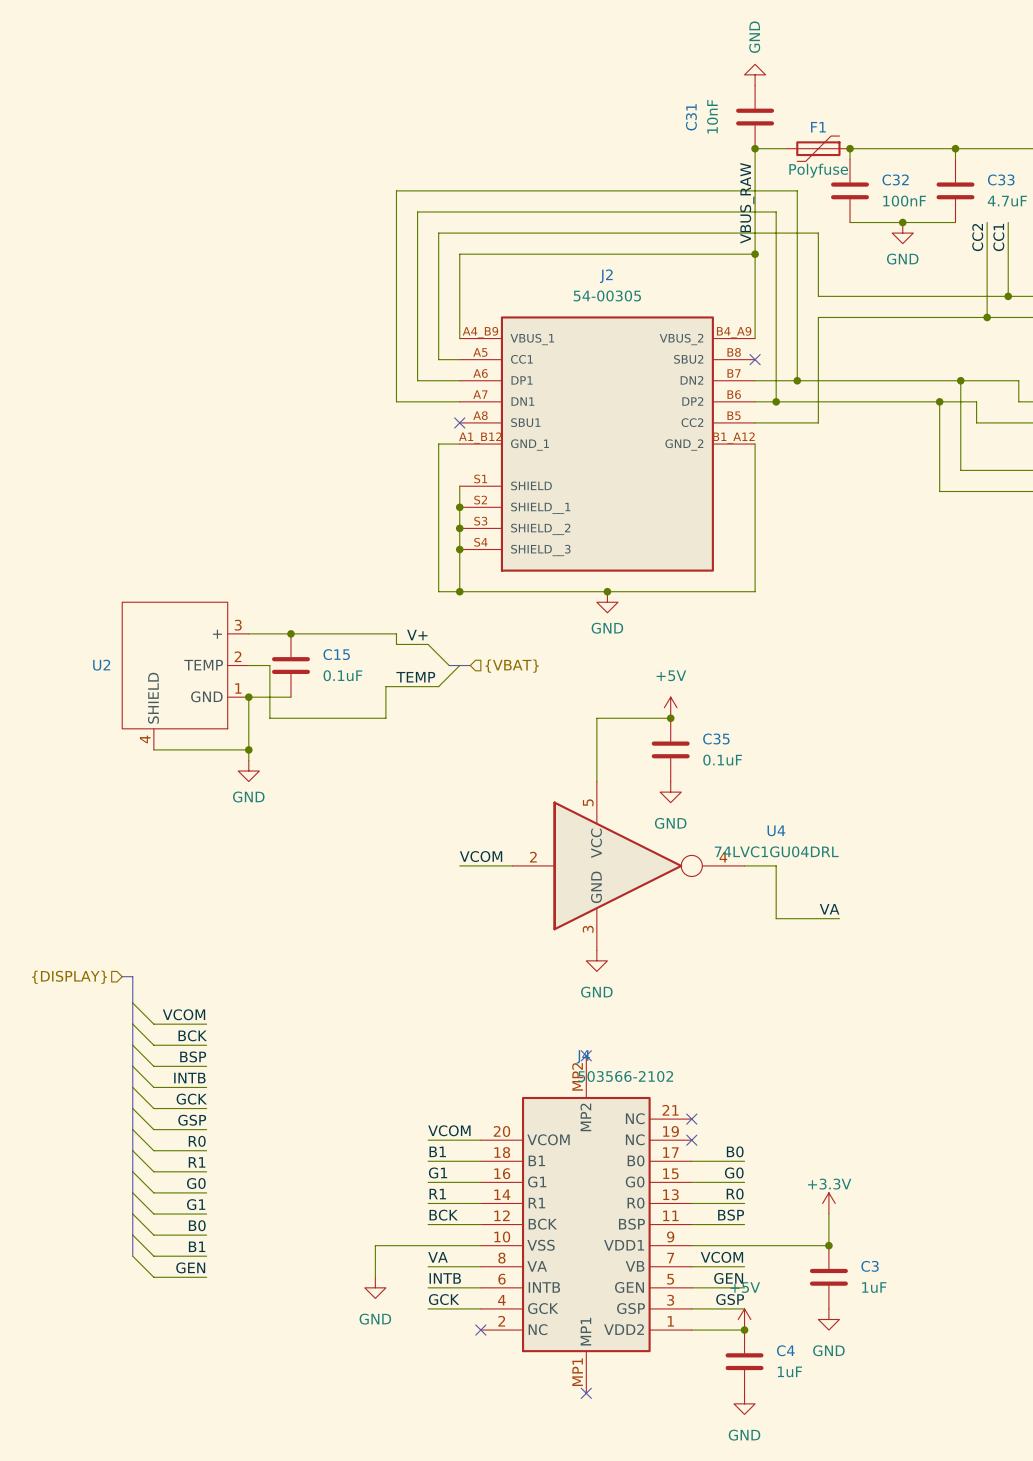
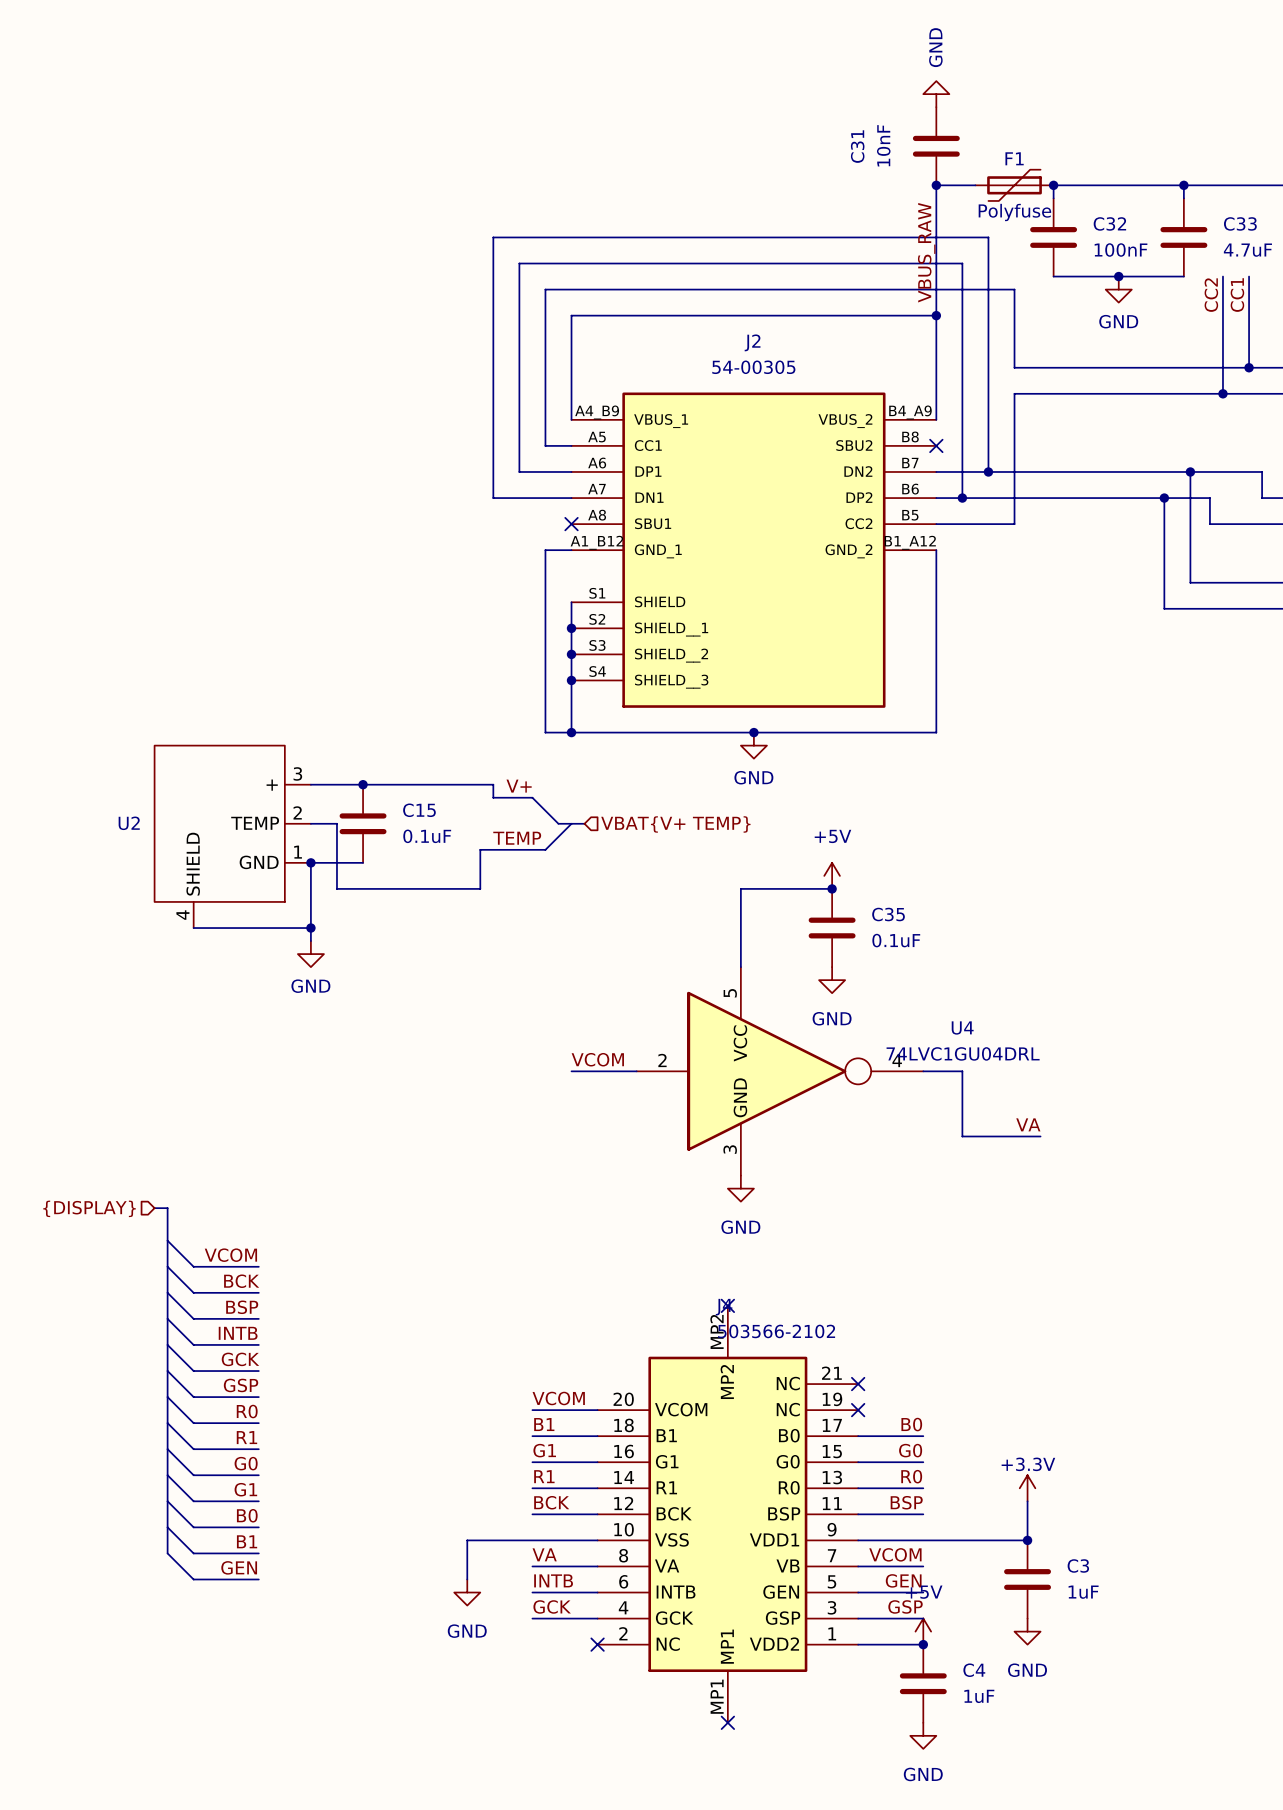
hierarchical label: {VBAT} (512, 666) -> VBAT{V+ TEMP} (675, 824)

